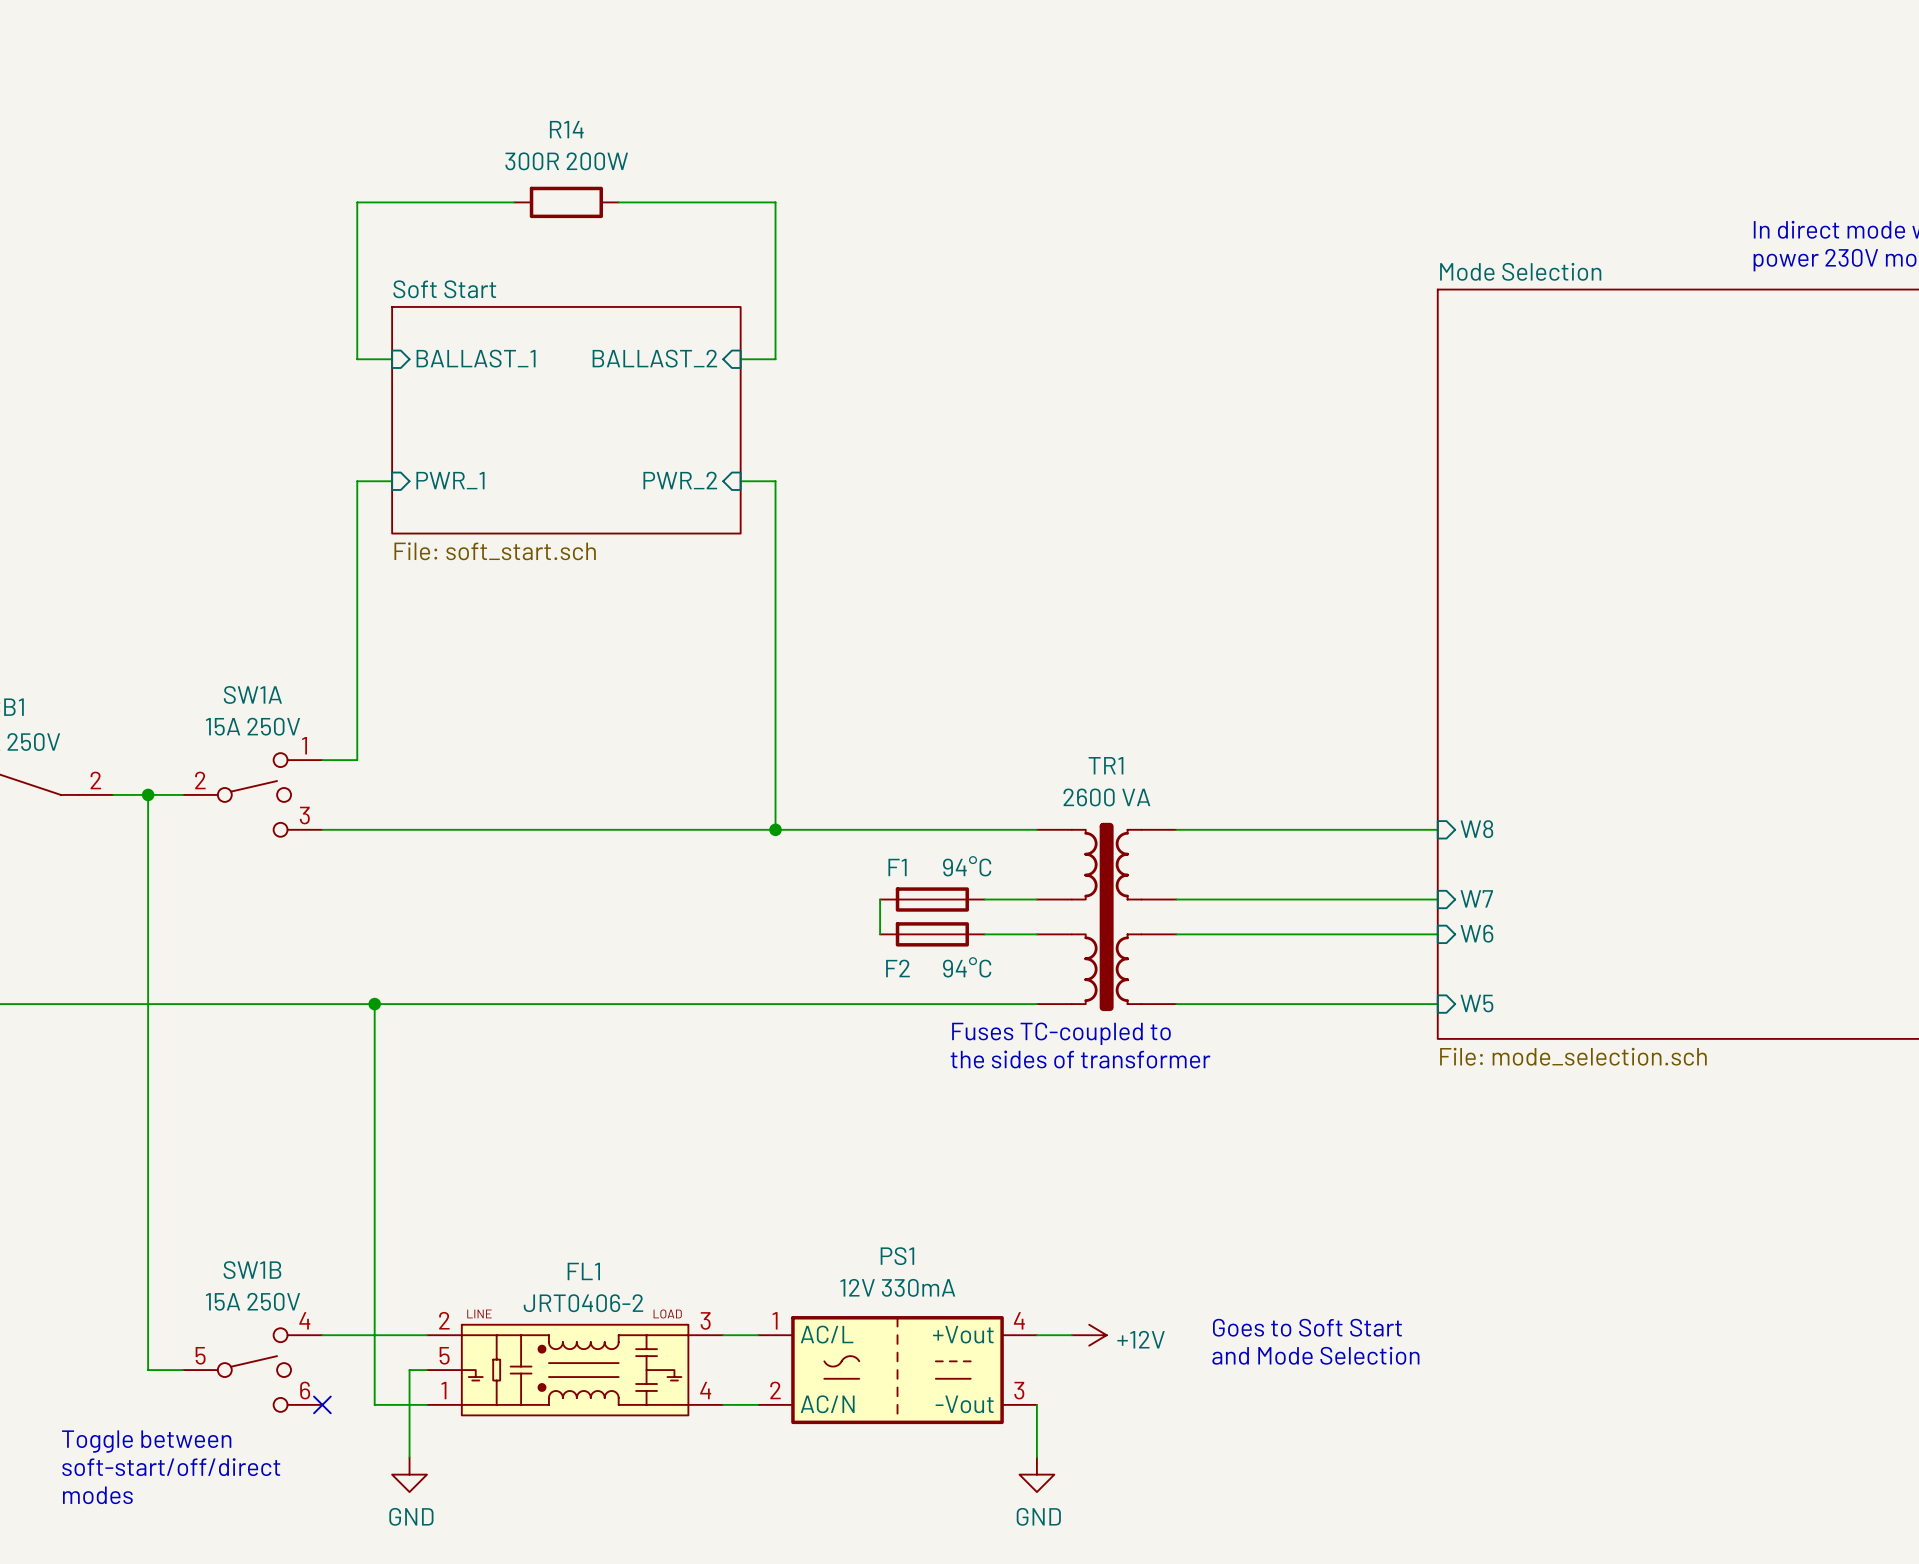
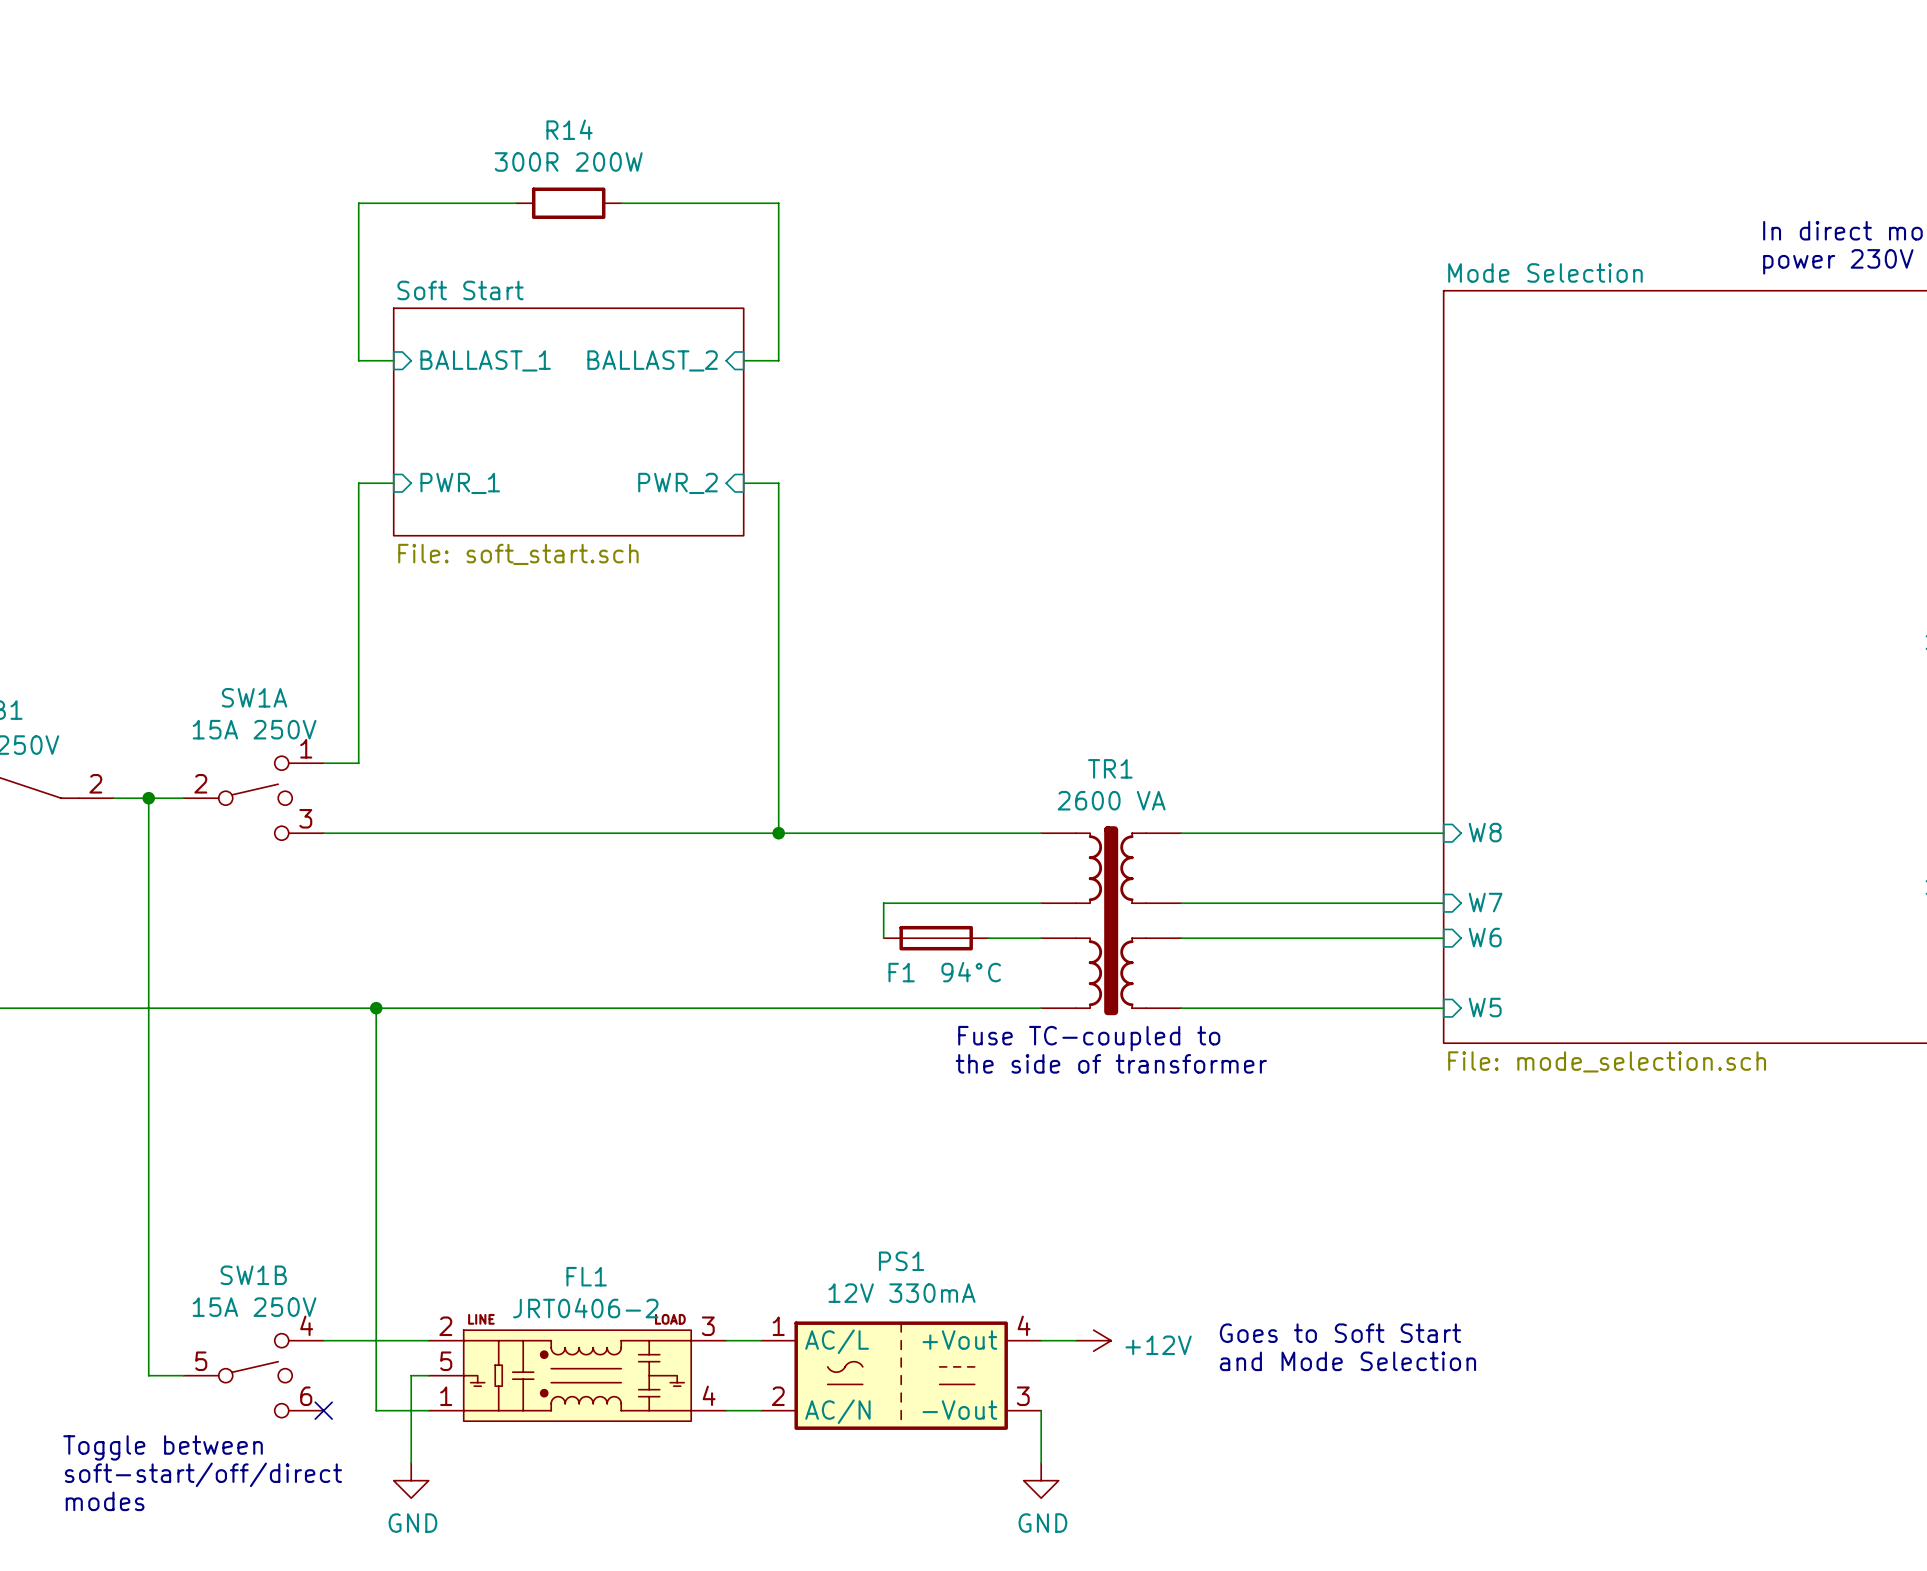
F1: 94°C (932, 899) -> none
F2 name: F2 (897, 968) -> F1 (901, 972)
text: Fuses TC-coupled to (1061, 1033) -> Fuse TC-coupled to (1089, 1038)
text: the sides of transformer (1080, 1059) -> the side of transformer (1111, 1063)

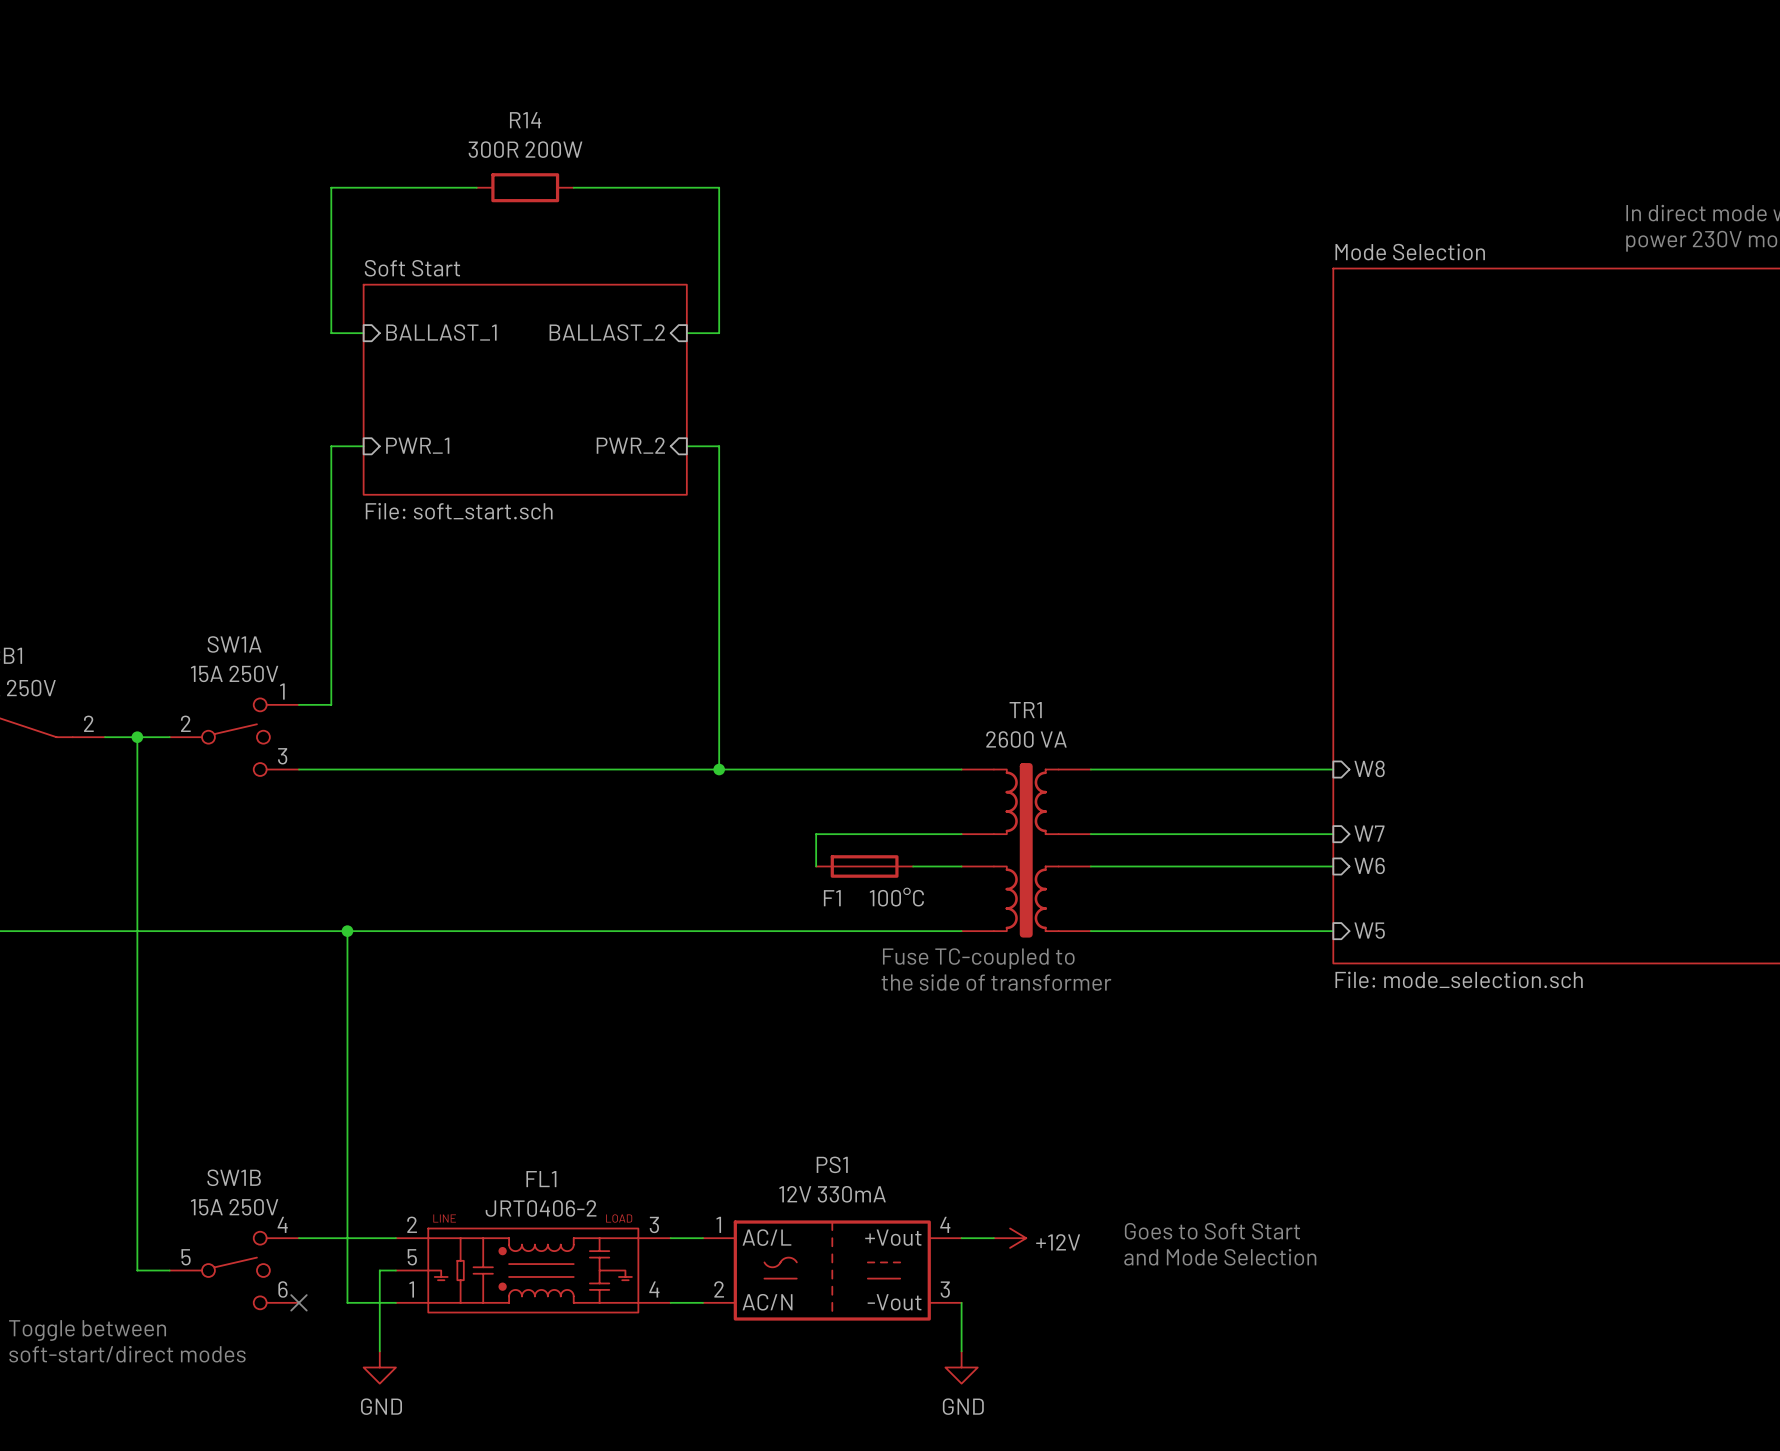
F1 value: 94°C (971, 972) -> 100°C (896, 897)
text position: Toggle between (163, 1447) -> Toggle between (87, 1330)
text: soft-start/off/direct (203, 1474) -> soft-start/direct modes (127, 1354)
text: modes (105, 1501) -> none

